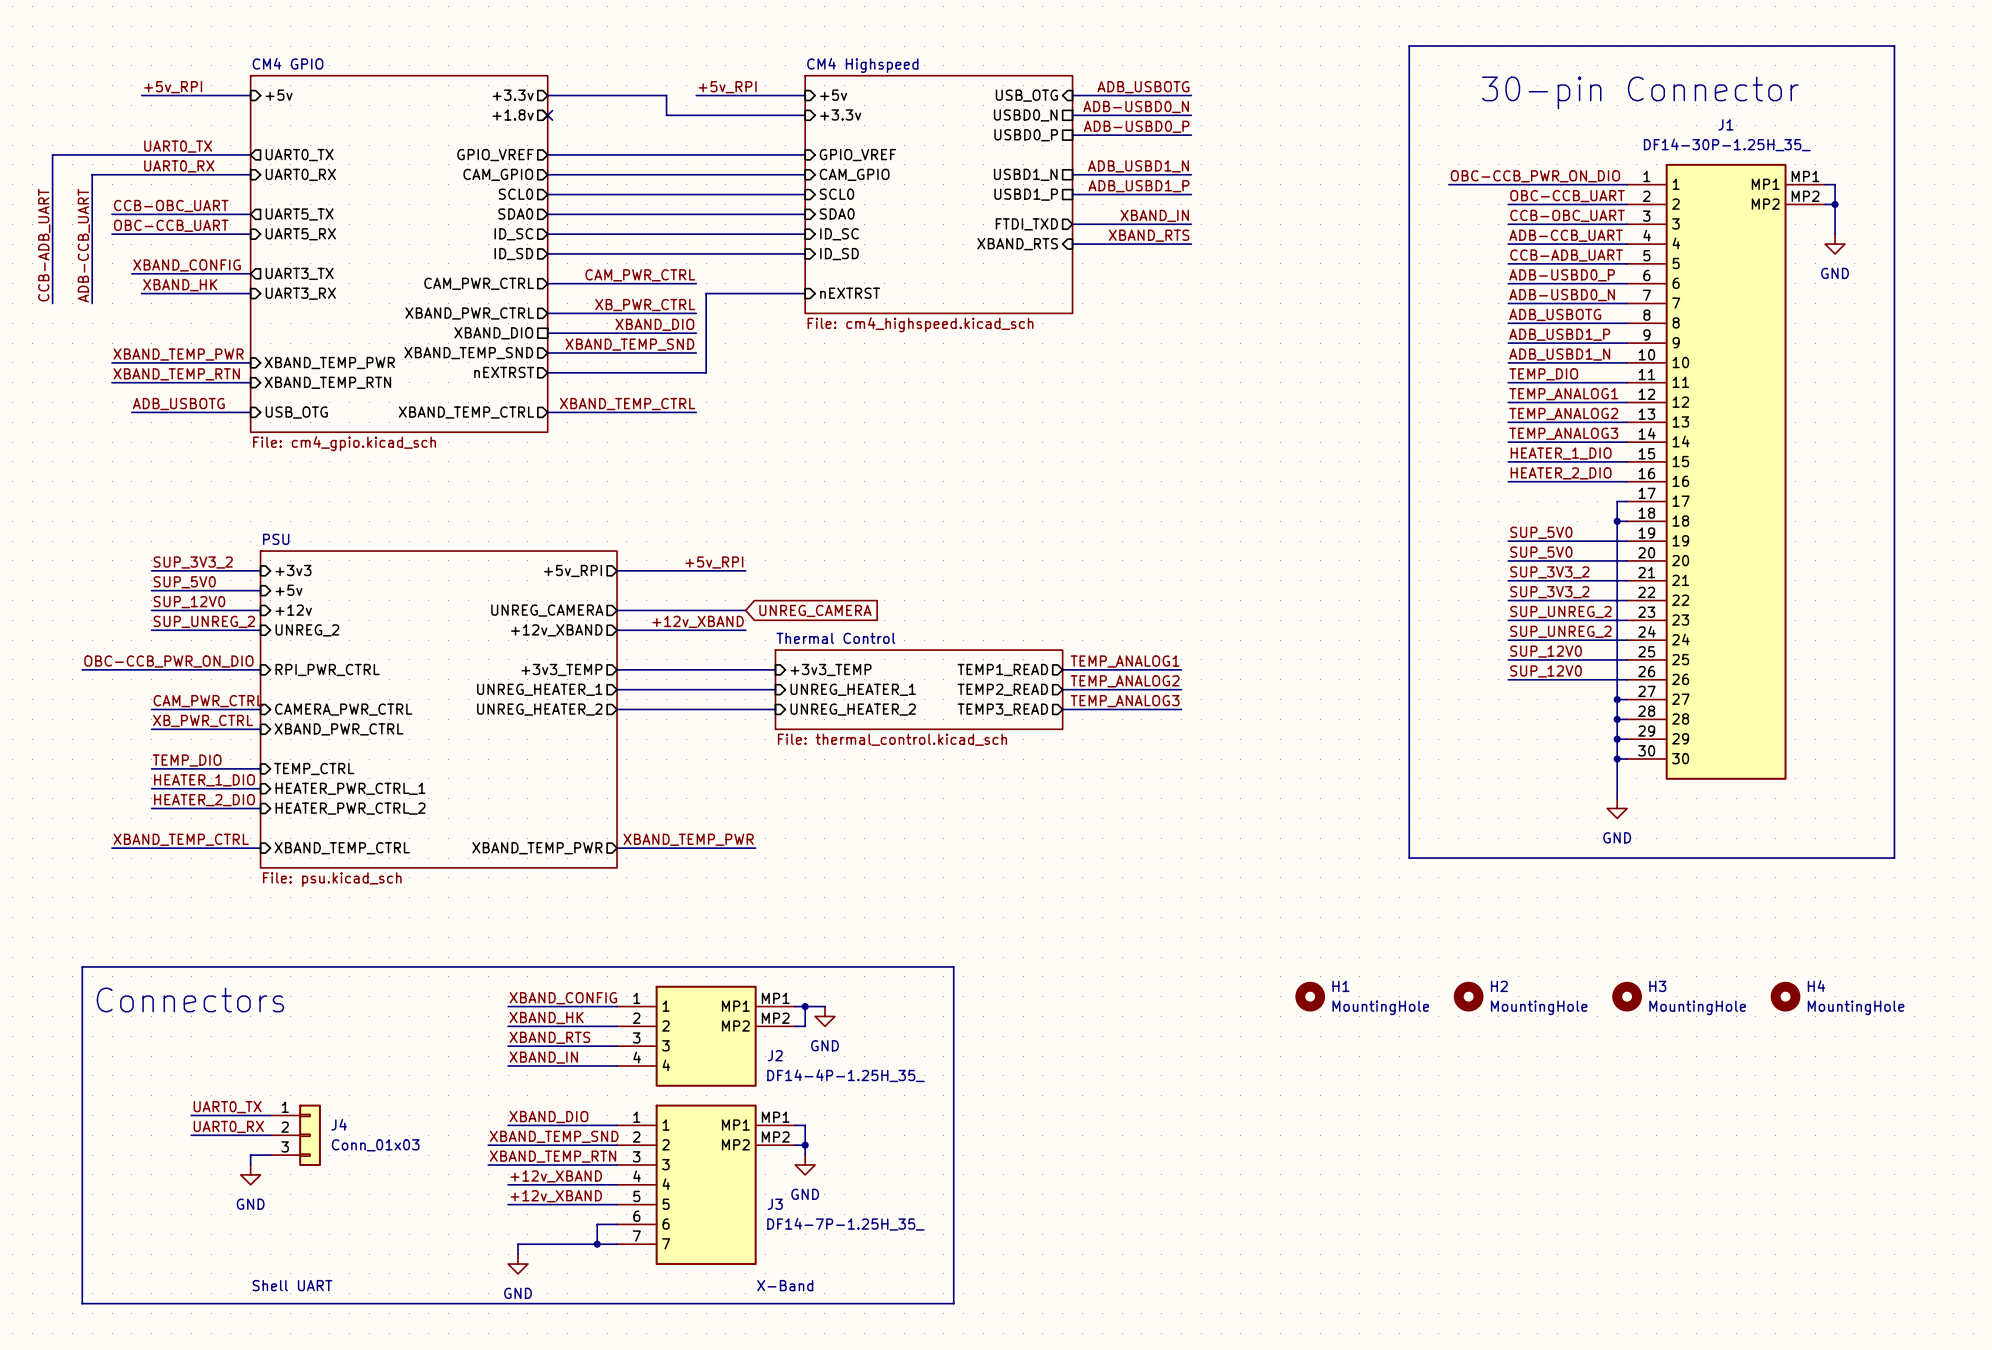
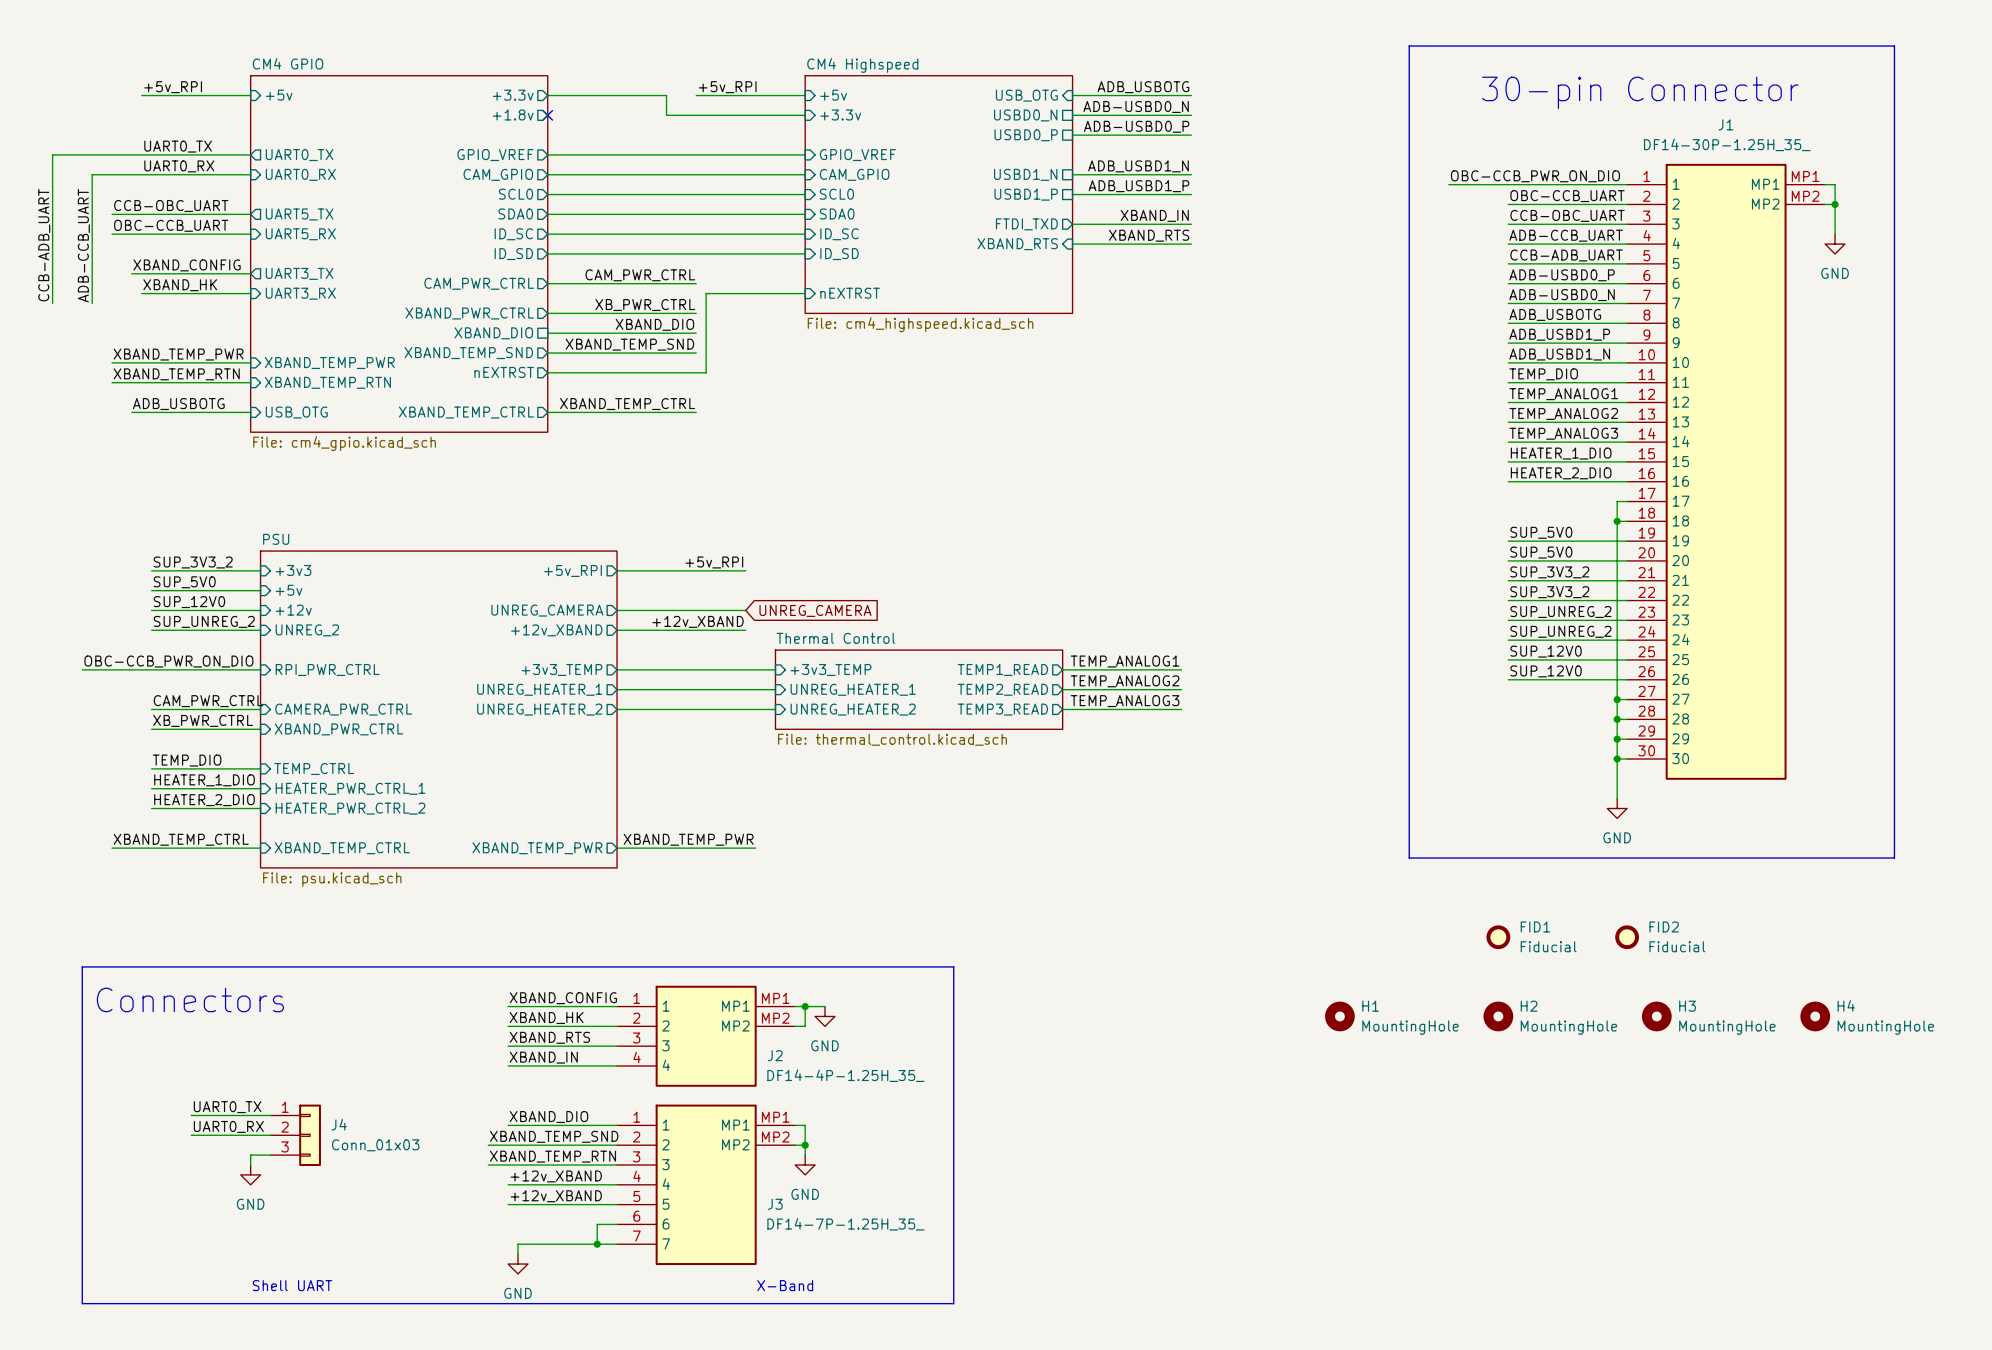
FID1: none -> Fiducial (1498, 937)
FID2: none -> Fiducial (1627, 937)
H1 position: (1310, 996) -> (1339, 1016)
H2 position: (1468, 996) -> (1498, 1016)
H3 position: (1627, 996) -> (1656, 1016)
H4 position: (1785, 996) -> (1815, 1016)

